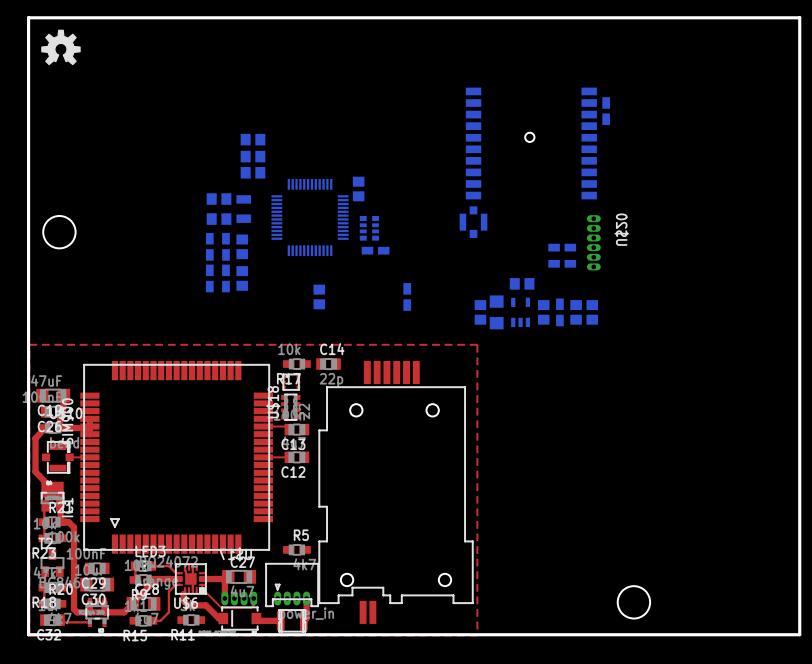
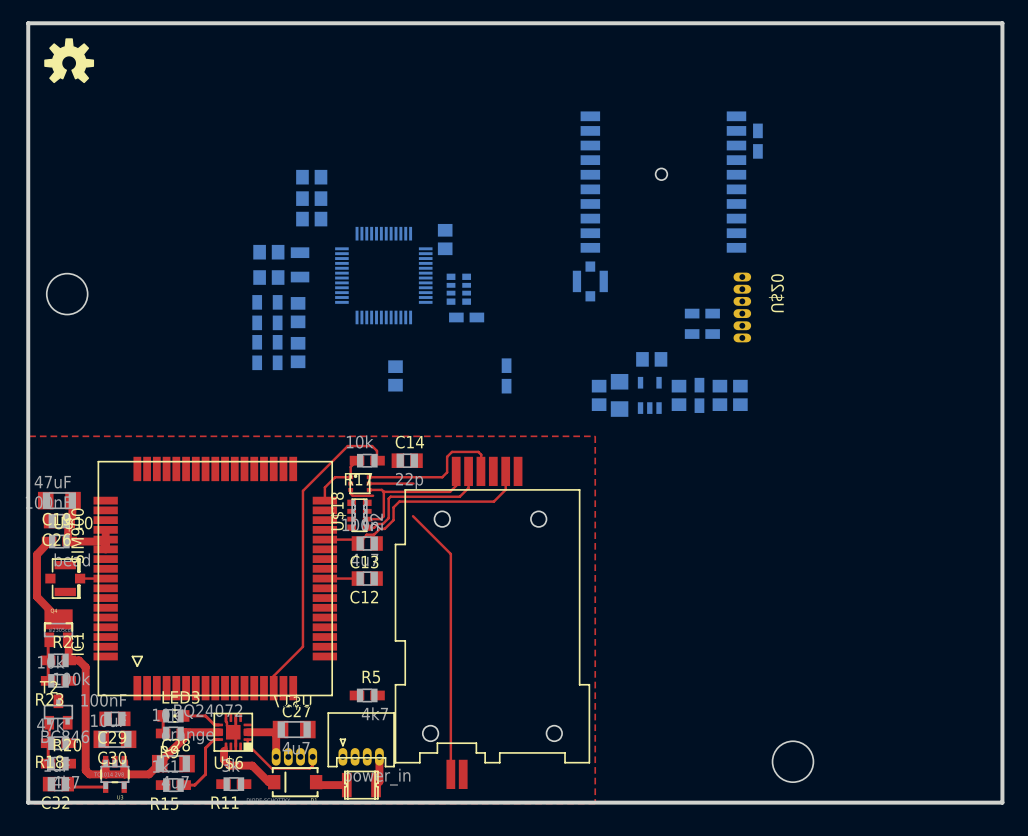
top track: none -> (357, 460) (350, 466) (350, 477) (335, 477) (324, 487) (324, 500)
top track: none -> (377, 460) (377, 450) (372, 446) (347, 446) (302, 490) (302, 646) (273, 675) (273, 688)
top track: none -> (456, 471) (456, 485) (450, 491) (383, 491)
top track: none -> (468, 471) (468, 487) (459, 496) (390, 496) (388, 498) (388, 518) (382, 524) (377, 524) (374, 527) (367, 527)
top track: none -> (480, 471) (481, 454) (478, 451) (452, 451) (447, 456) (447, 472) (442, 477) (369, 477)
top track: none -> (505, 471) (505, 489) (493, 501) (399, 501) (393, 507) (393, 520) (384, 528) (379, 528) (374, 534) (366, 534) (358, 545) (358, 543)
top track: none -> (369, 483) (413, 483)
top track: none -> (350, 489) (352, 495) (373, 495)
top track: none -> (369, 489) (381, 489) (383, 491)
top track: none -> (383, 491) (383, 516) (380, 519) (367, 519)
top track: none -> (413, 516) (450, 554) (450, 774)

